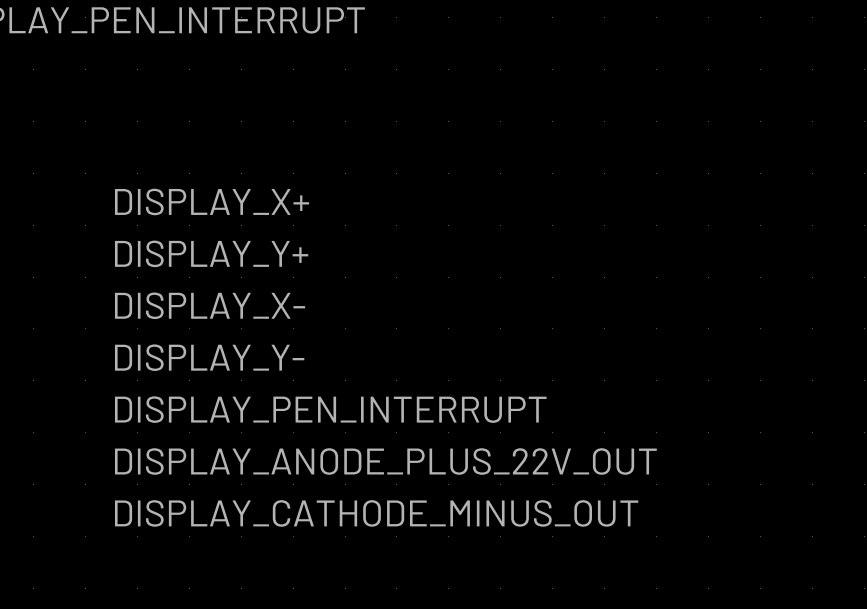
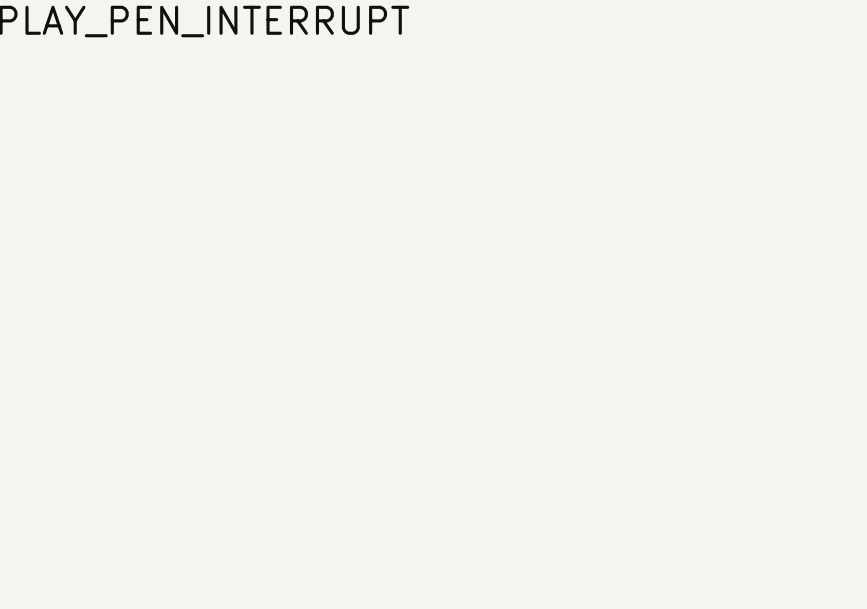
label: DISPLAY_X+ (212, 201) -> none
label: DISPLAY_Y+ (211, 253) -> none
label: DISPLAY_X- (210, 305) -> none
label: DISPLAY_Y- (209, 357) -> none
label: DISPLAY_PEN_INTERRUPT (330, 409) -> none
label: DISPLAY_ANODE_PLUS_22V_OUT (385, 461) -> none
label: DISPLAY_CATHODE_MINUS_OUT (376, 513) -> none

